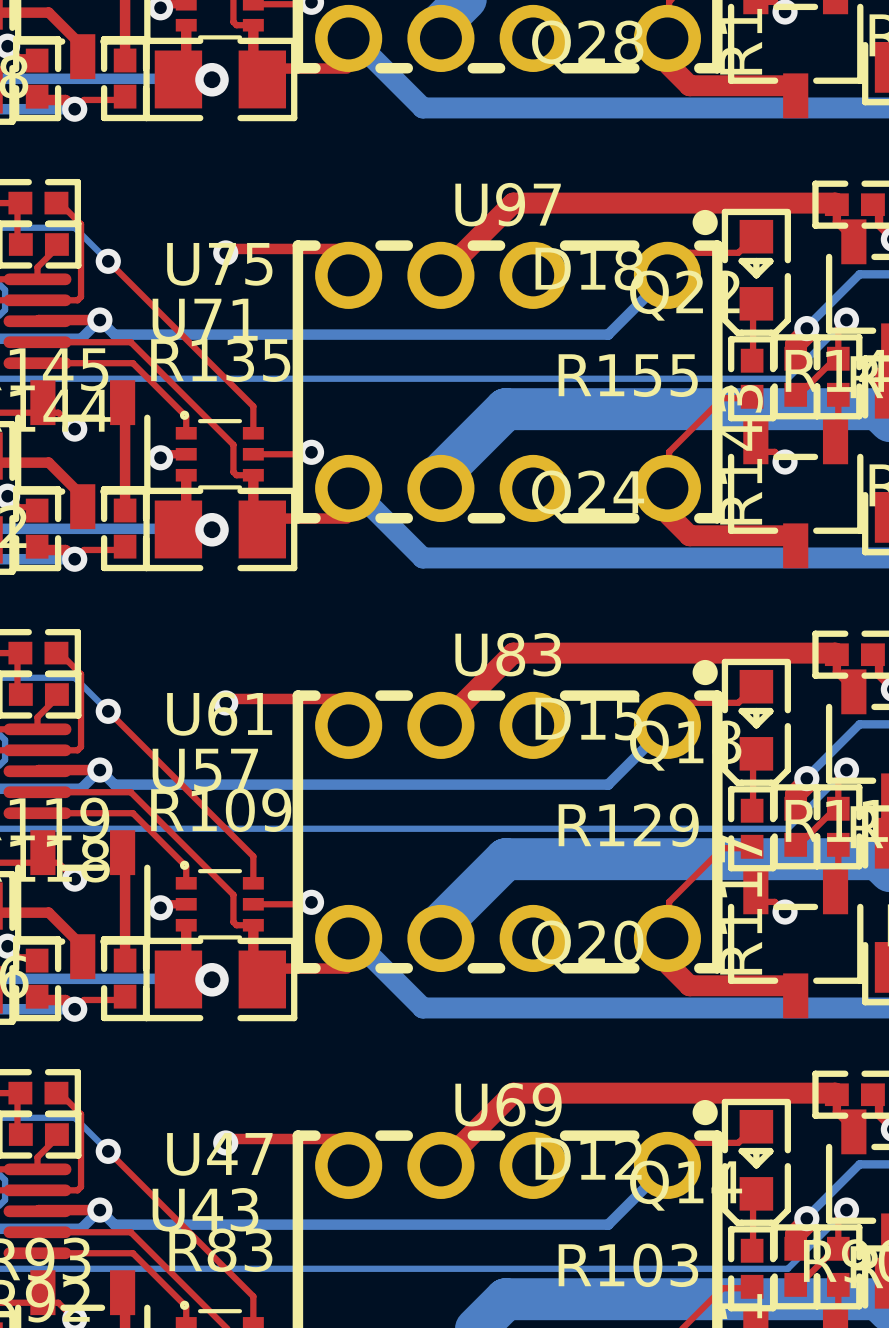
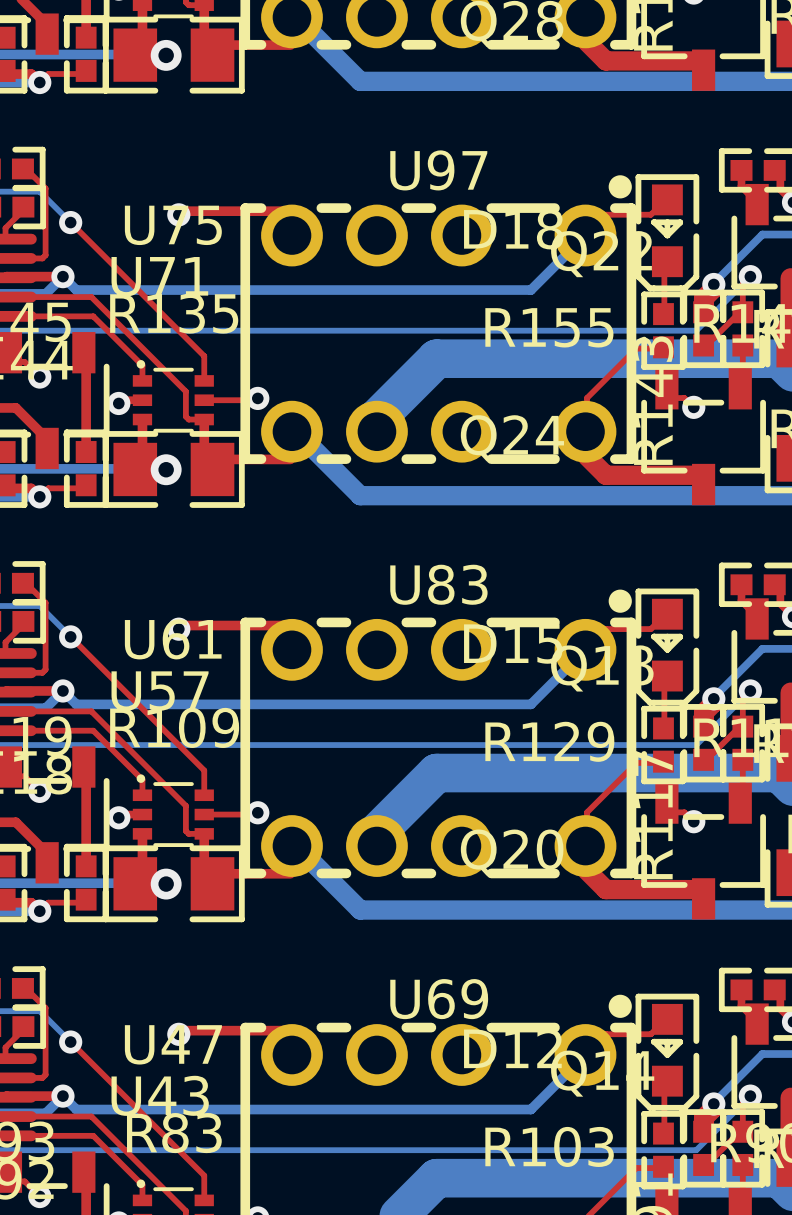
top track: (836, 204) (835, 203) (513, 203) (440, 275) -> none
top track: (836, 654) (835, 653) (513, 653) (440, 725) -> none
top track: (836, 1094) (835, 1093) (513, 1093) (440, 1165) -> none

